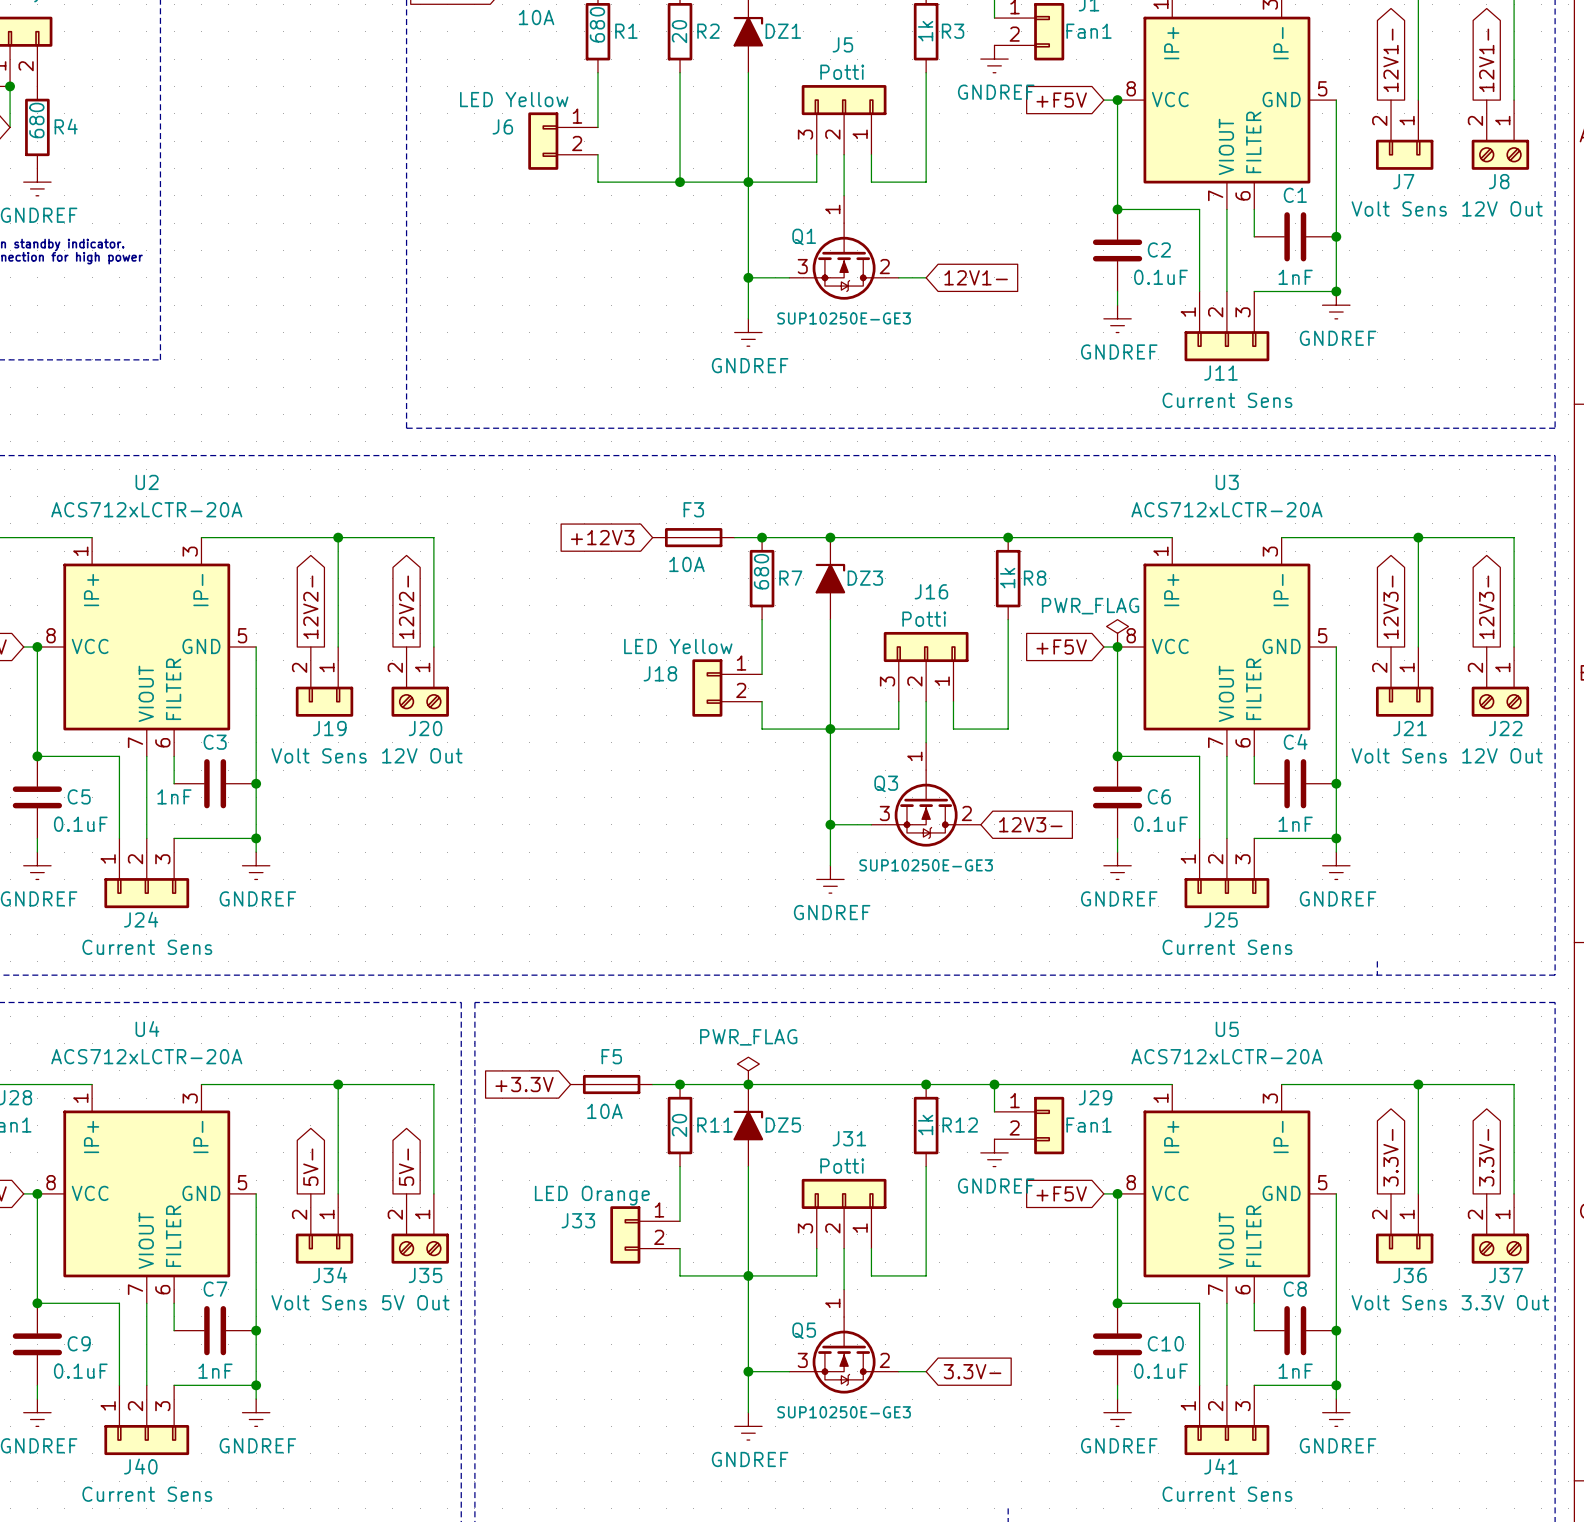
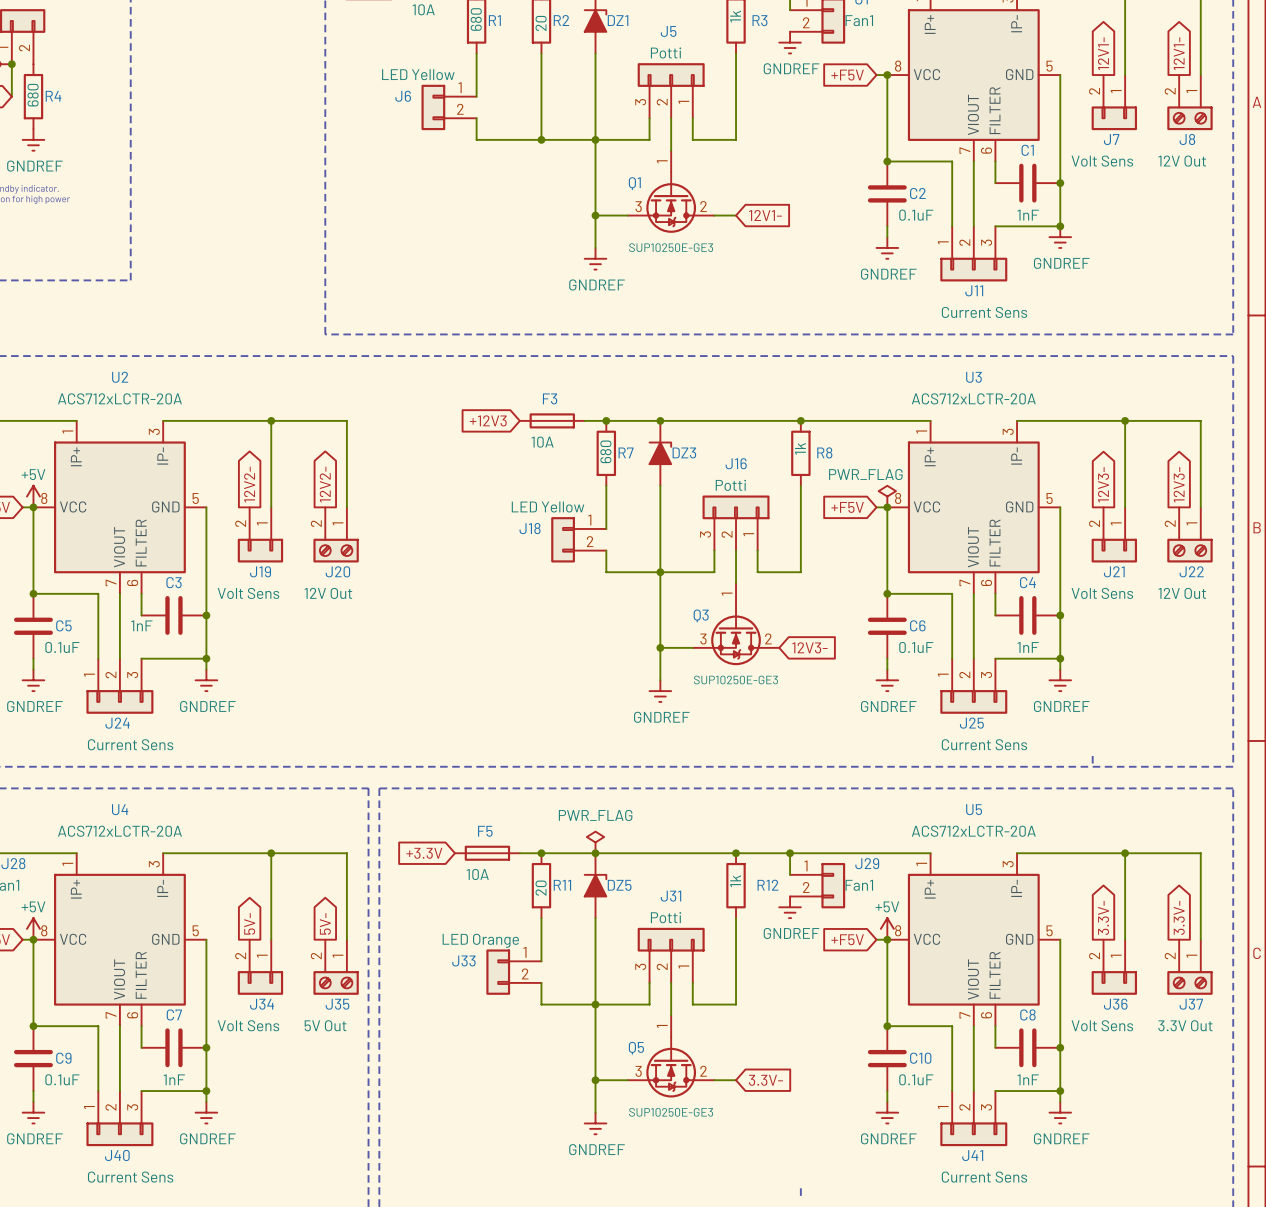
power symbol: none -> +5V (33, 496)
power symbol: none -> +5V (33, 928)
power symbol: none -> +5V (887, 928)

